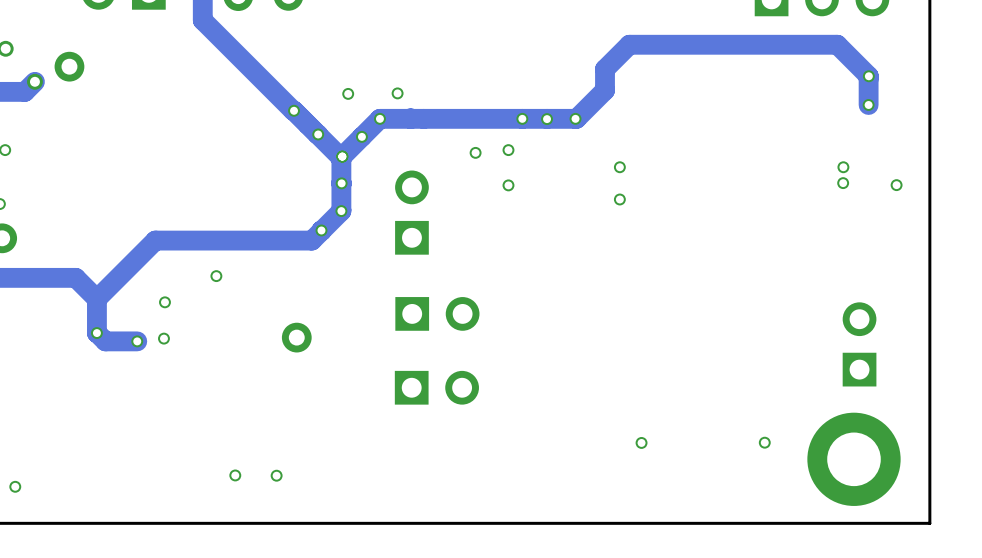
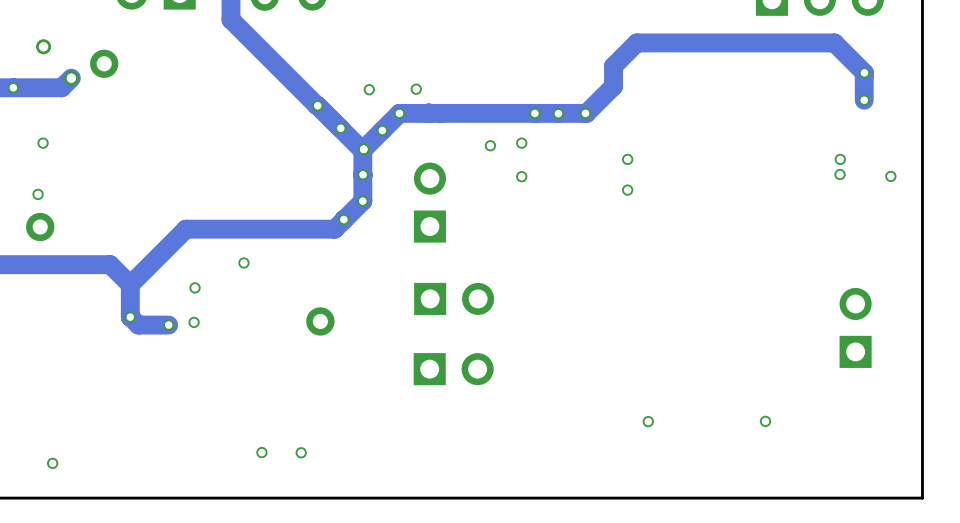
part: (853, 459) -> none

